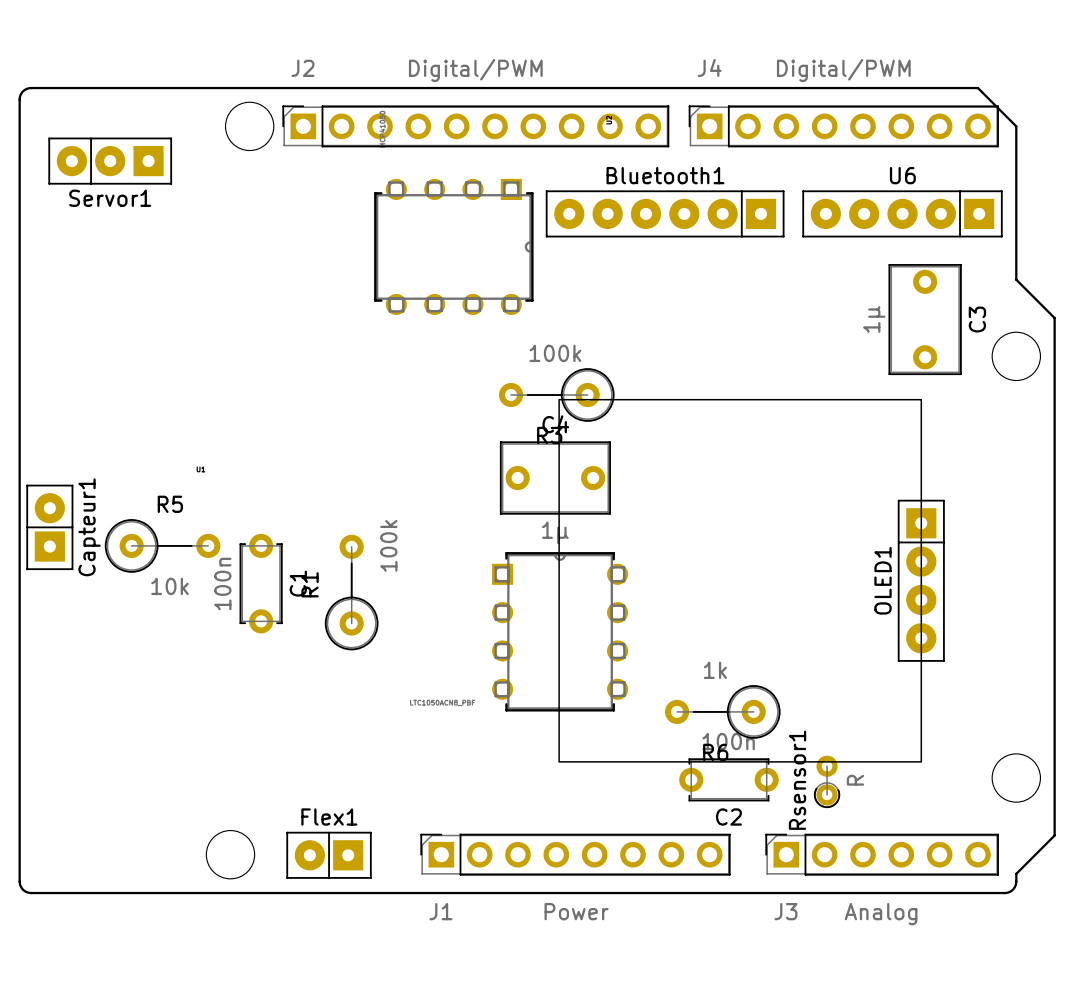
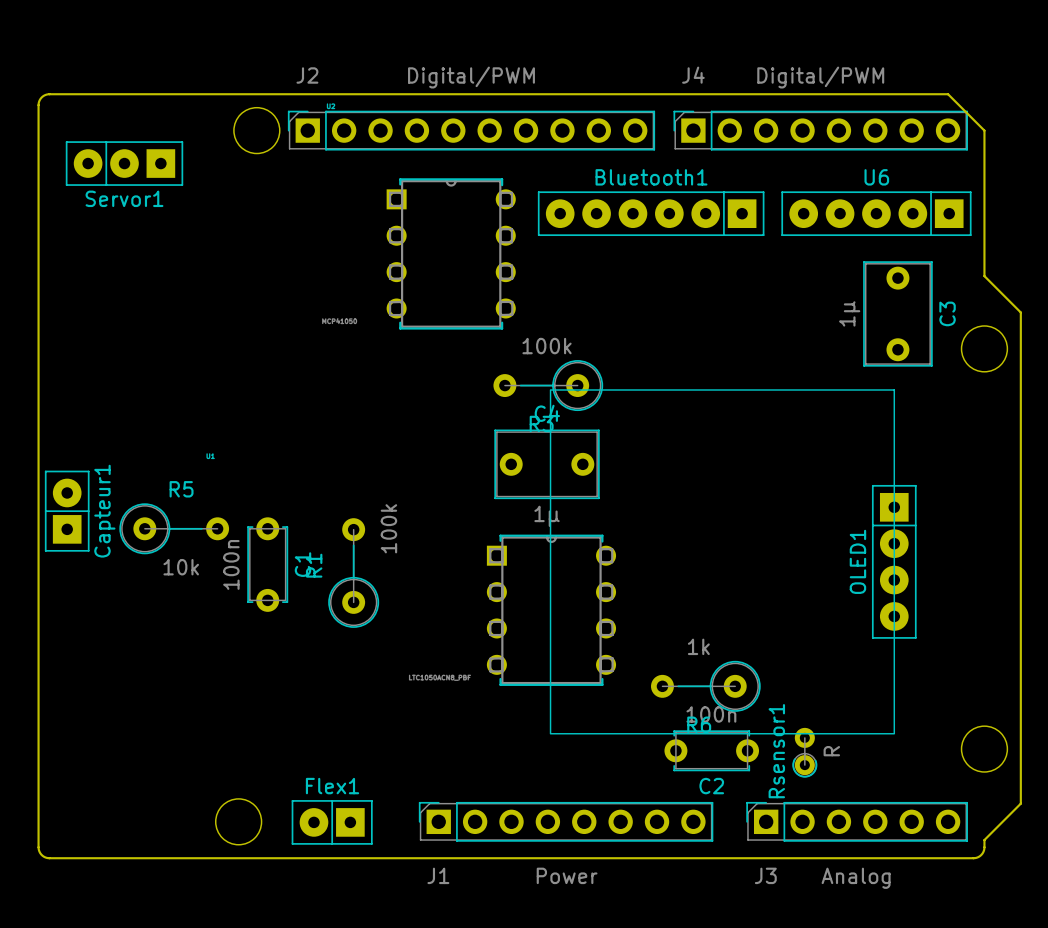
part rotation: 0° (453, 246) -> 90° counterclockwise (451, 253)

